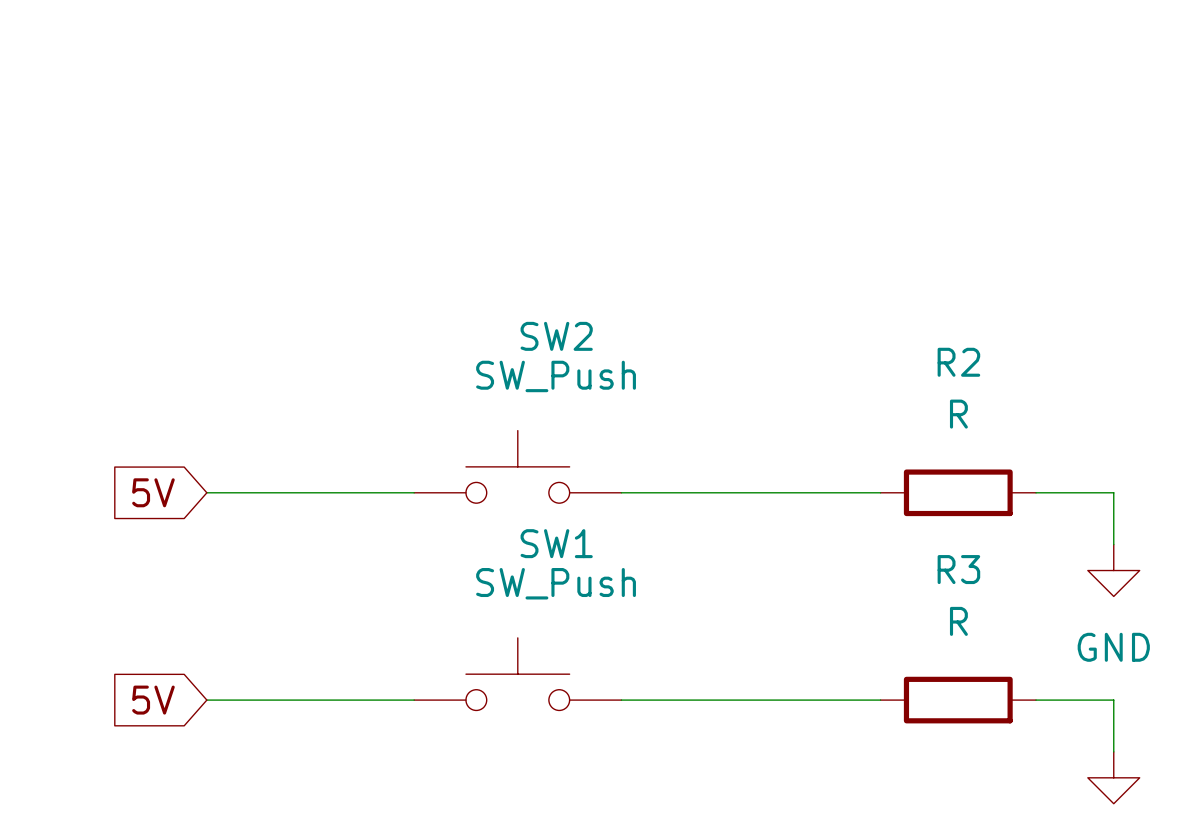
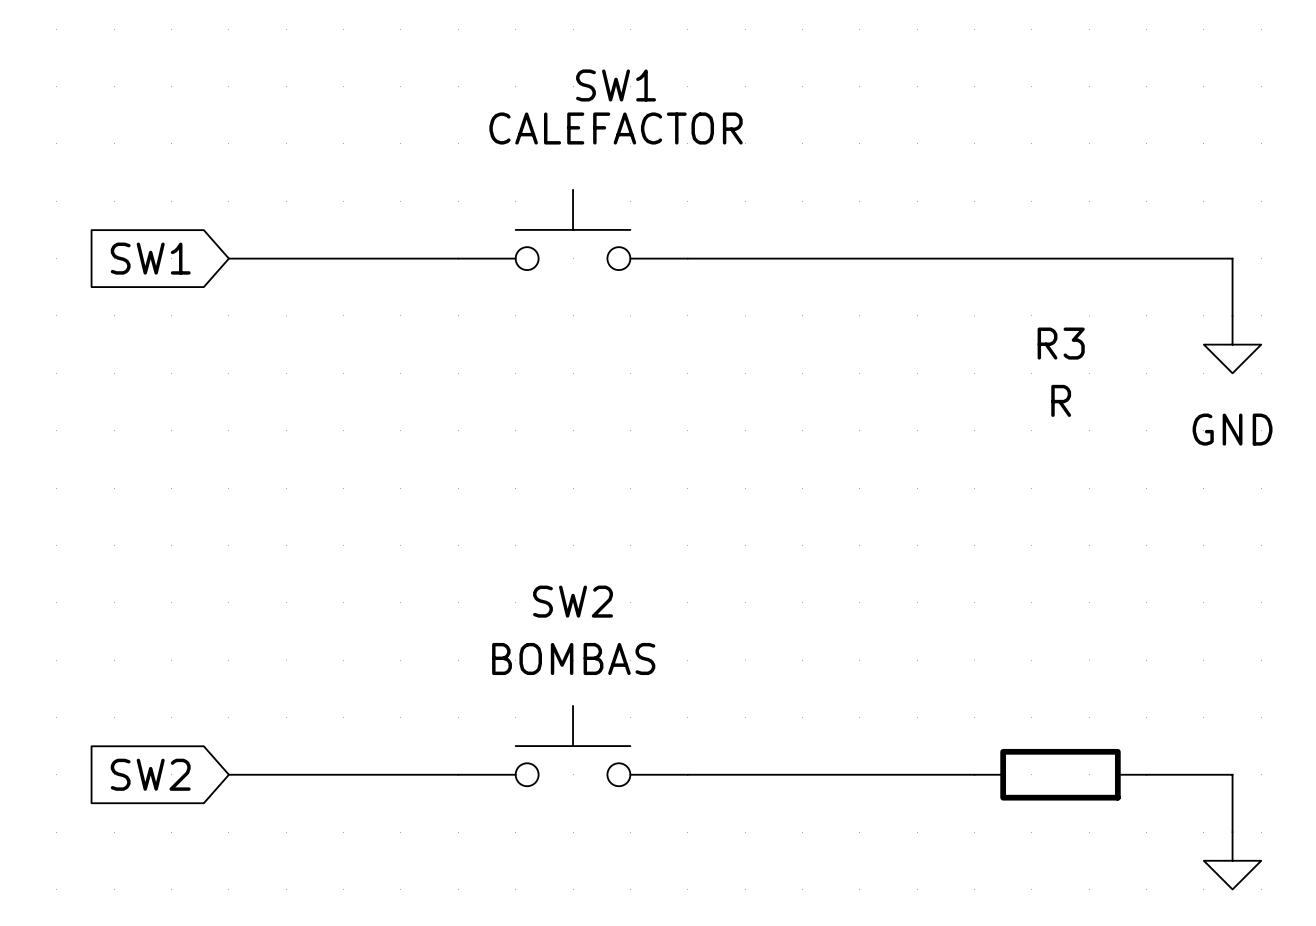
SW1: none -> CALEFACTOR (573, 229)
global label: none -> SW1 (150, 258)
wire: none -> (687, 258) (1232, 258) (1232, 315)
SW2: SW_Push (517, 466) -> none
global label: 5V (153, 492) -> none
wire: (206, 492) (414, 492) -> (228, 258) (458, 258)
wire: (621, 492) (880, 492) -> none
R2: R (958, 492) -> none
wire: (1036, 492) (1113, 492) (1113, 544) -> none
SW1 name: SW1 (556, 543) -> SW2 (573, 601)
R3 name position: R3 (958, 569) -> R3 (1061, 343)
power symbol position: GND (1113, 570) -> GND (1232, 344)
SW1 value: SW_Push (556, 583) -> BOMBAS (573, 658)
R3 value position: R (958, 621) -> R (1061, 400)
global label: 5V (153, 700) -> SW2 (150, 774)

